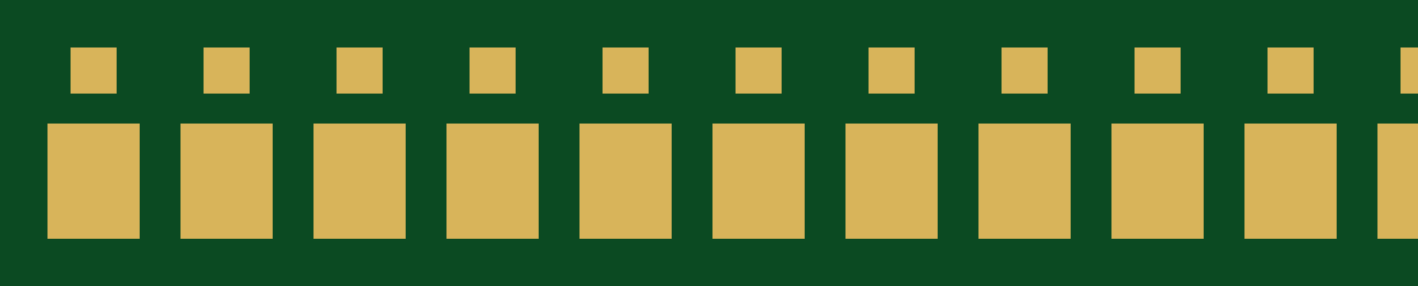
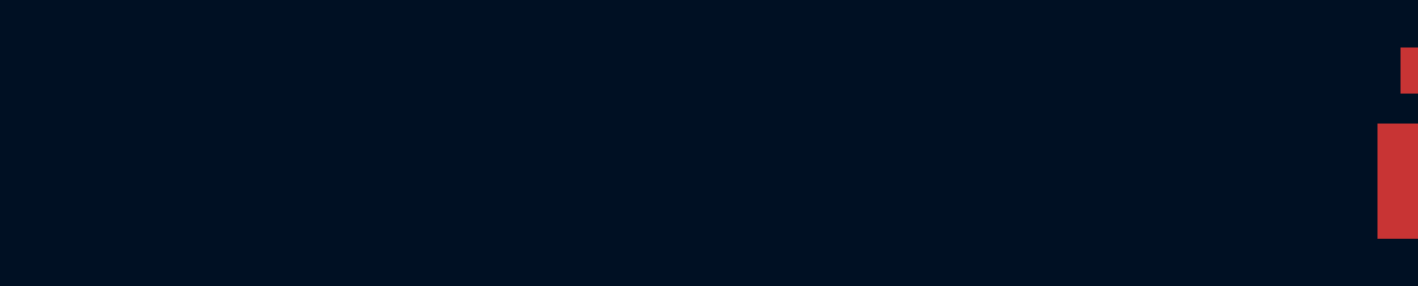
part: (93, 143) -> none
part: (226, 143) -> none
part: (359, 143) -> none
part: (492, 143) -> none
part: (625, 143) -> none
part: (758, 143) -> none
part: (891, 143) -> none
part: (1024, 143) -> none
part: (1157, 143) -> none
part: (1290, 143) -> none

